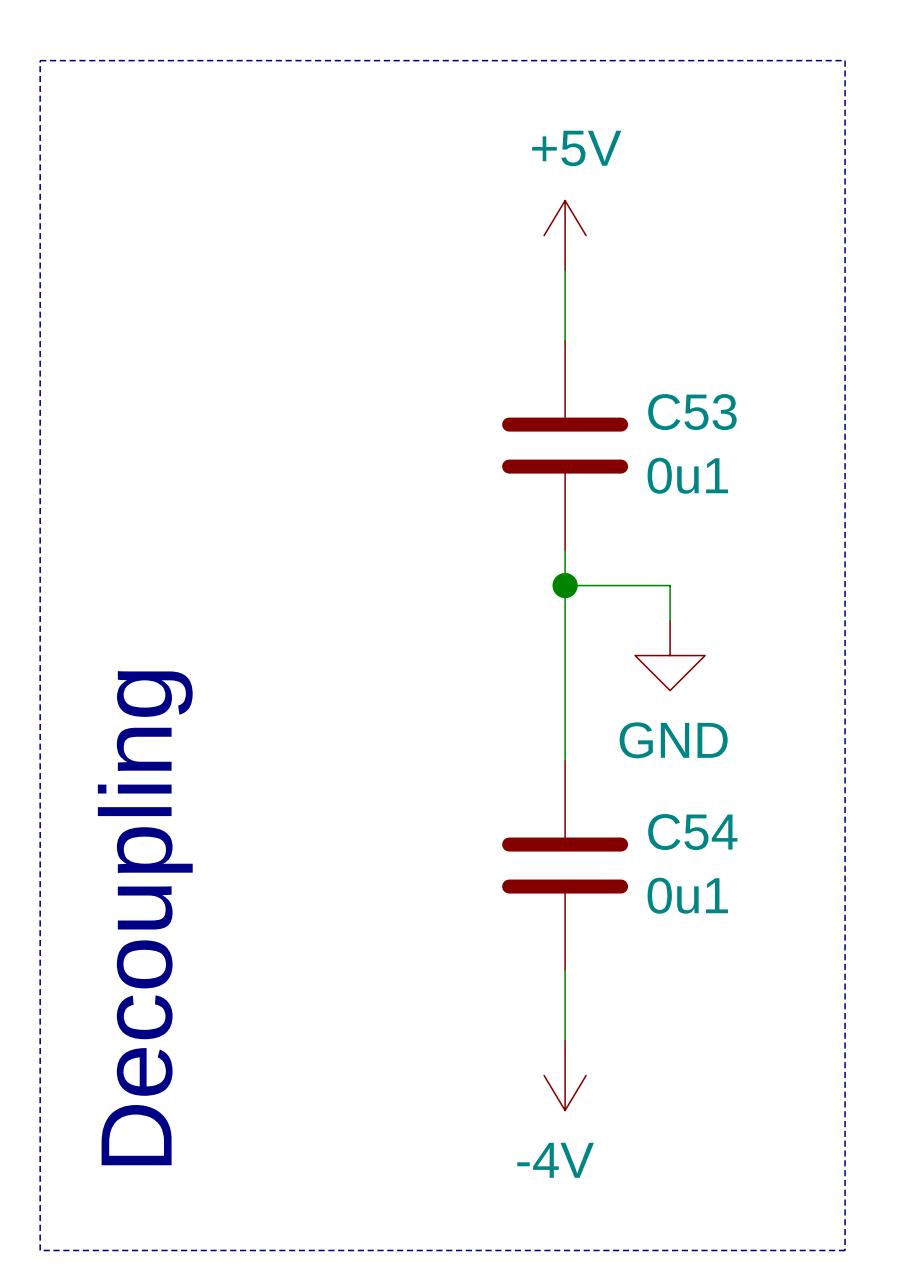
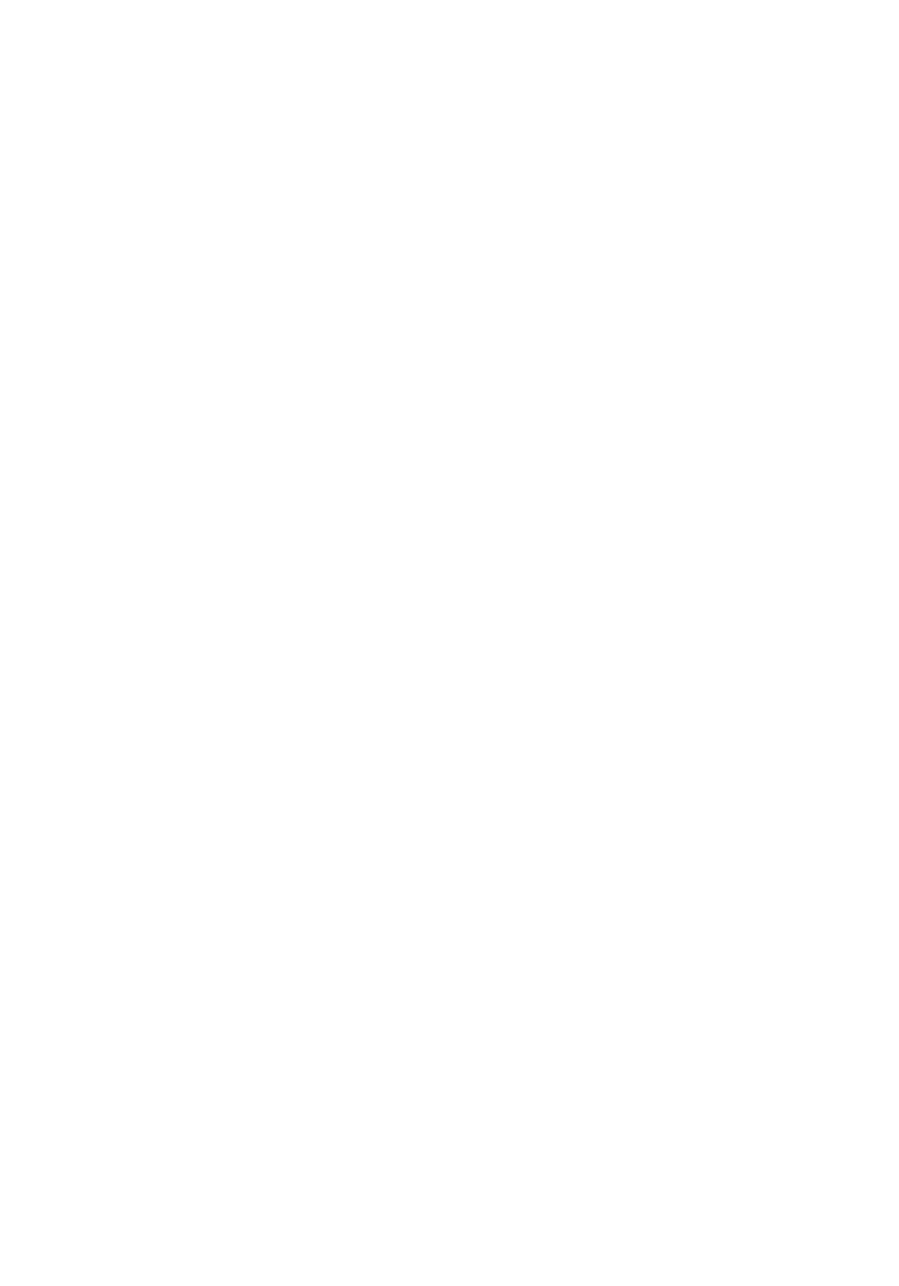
line: (40, 60) (40, 1250) (845, 1250) (845, 60) (40, 60) -> none
power symbol: +5V (565, 235) -> none
wire: (565, 270) (565, 340) -> none
C53: 0u1 (565, 445) -> none
wire: (565, 550) (565, 760) -> none
wire: (565, 585) (670, 585) (670, 620) -> none
junction: (565, 585) -> none
power symbol: GND (670, 655) -> none
C54: 0u1 (565, 865) -> none
text: Decoupling (145, 918) -> none
wire: (565, 970) (565, 1040) -> none
power symbol: -4V (565, 1075) -> none

